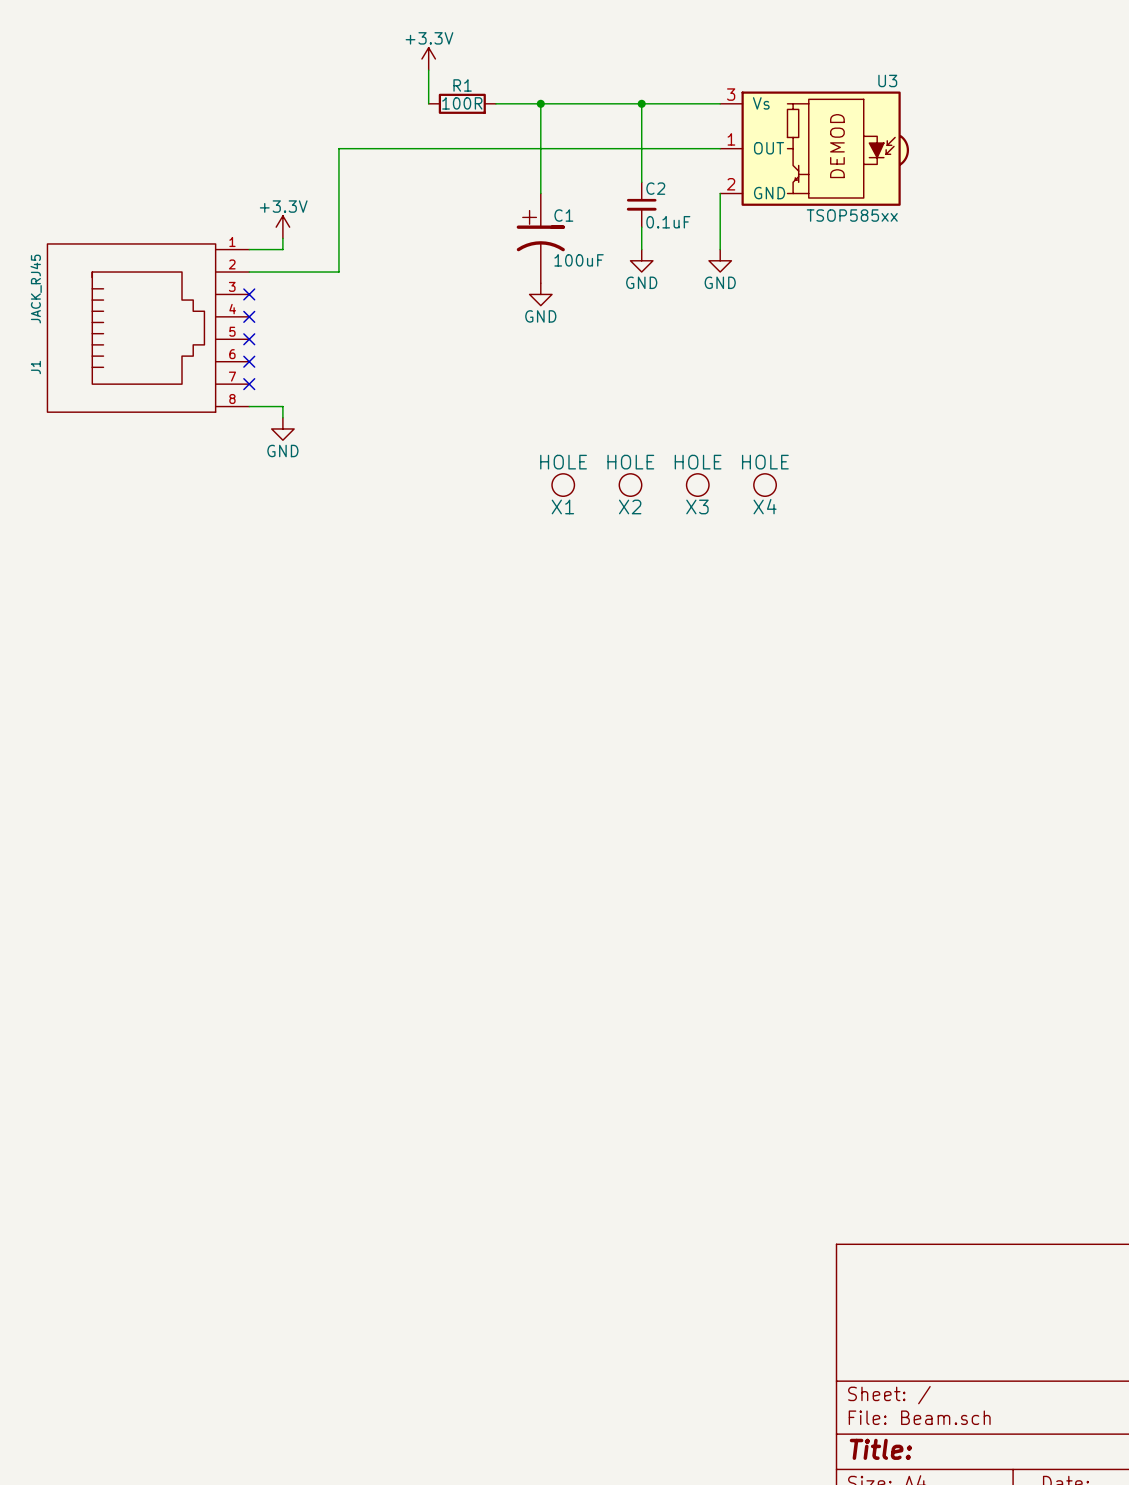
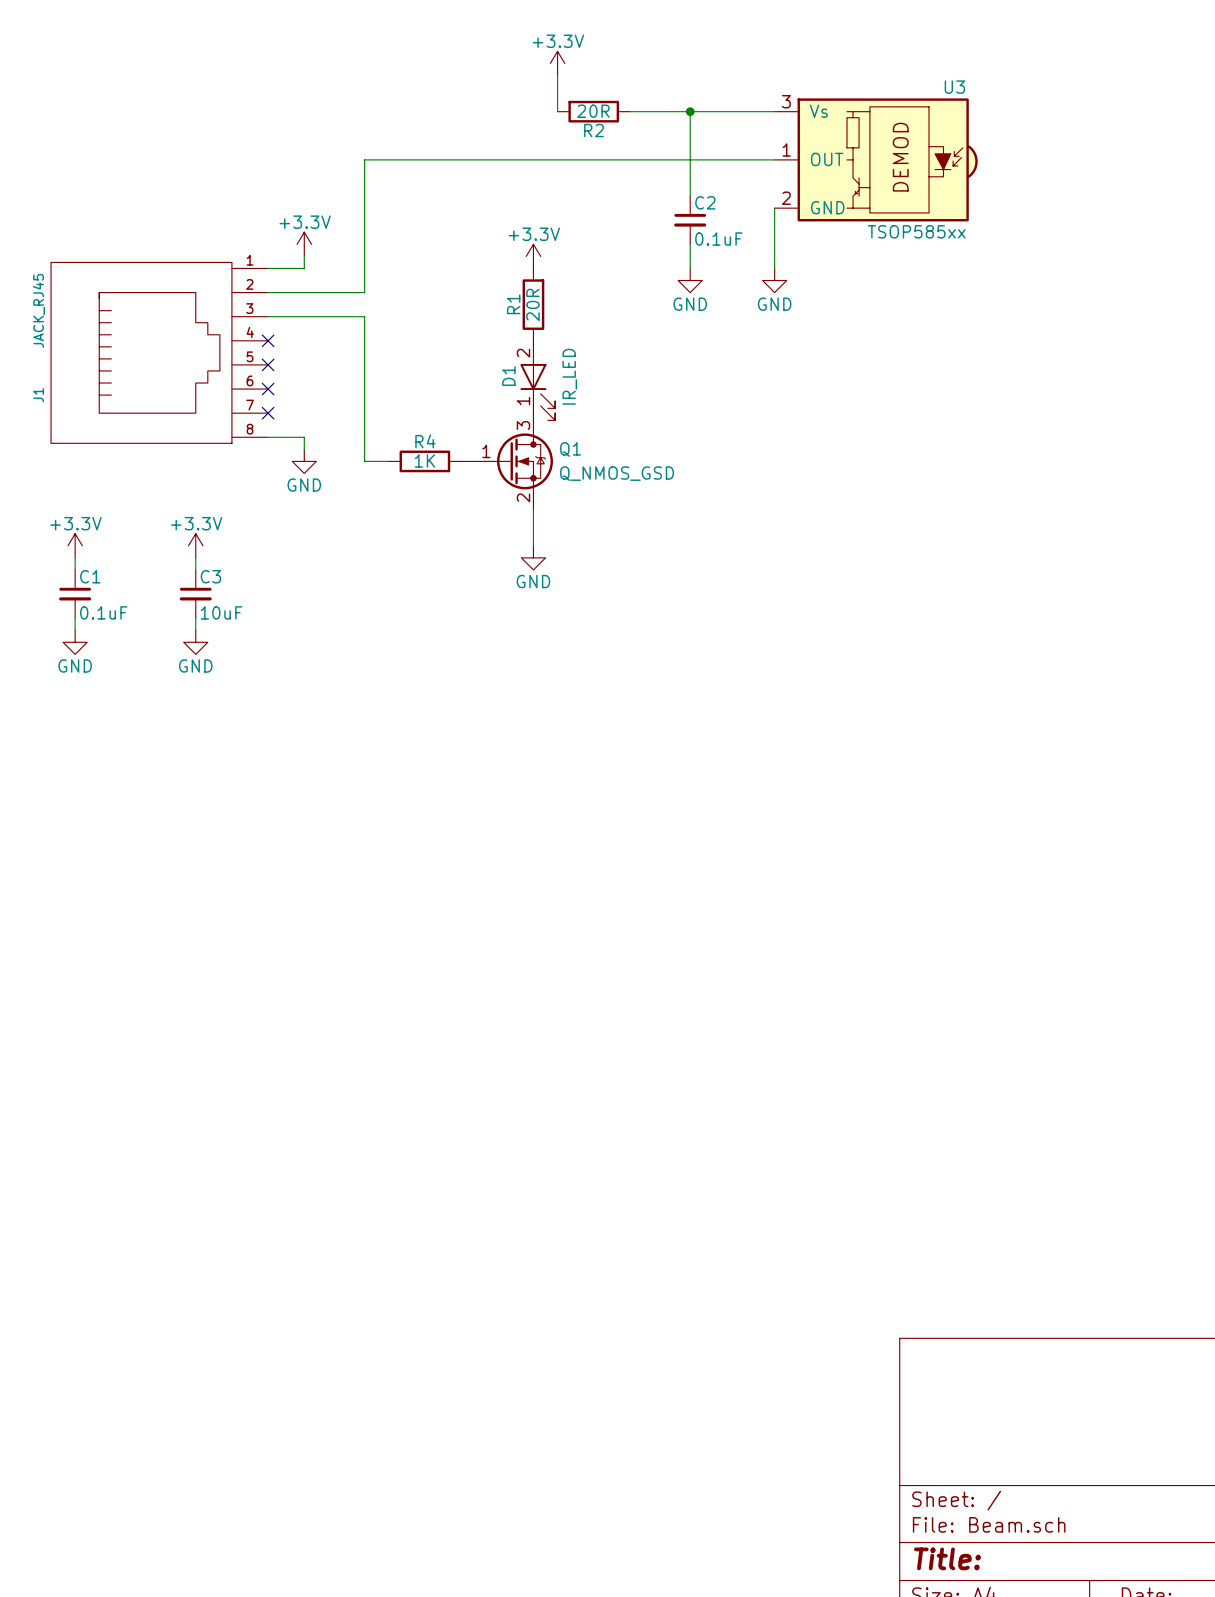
power symbol position: +3.3V (428, 58) -> +3.3V (557, 63)
wire: (428, 70) (428, 103) -> (557, 75) (557, 111)
R1 name position: R1 (462, 85) -> R1 (513, 304)
R1 rotation: 0° (462, 103) -> 90° clockwise (533, 304)
R1 position: (462, 103) -> (533, 304)
R1 value: 100R (462, 103) -> 20R (532, 304)
wire: (495, 103) (585, 103) -> none
wire: (540, 103) (540, 193) -> none
junction: (540, 103) -> none
R2: none -> 20R (593, 111)
C1 symbol: [516, 193, 565, 284] -> [59, 569, 92, 619]
power symbol: none -> +3.3V (533, 256)
C1 value: 100uF (579, 260) -> 0.1uF (103, 612)
wire: none -> (268, 316) (364, 316) (364, 461) (388, 461)
no-connect mark: (249, 294) -> none
power symbol: GND (540, 294) -> none
D1: none -> IR_LED (537, 380)
R4: none -> 1K (424, 461)
Q1: none -> Q_NMOS_GSD (507, 461)
wire: none -> (533, 509) (533, 545)
X1: HOLE (563, 485) -> none
X2: HOLE (630, 485) -> none
X3: HOLE (697, 485) -> none
X4: HOLE (765, 485) -> none
power symbol: none -> +3.3V (75, 545)
power symbol: none -> +3.3V (195, 545)
wire: none -> (75, 557) (75, 569)
wire: none -> (195, 557) (195, 569)
power symbol: none -> GND (533, 557)
C3: none -> 10uF (195, 594)
wire: none -> (75, 618) (75, 630)
wire: none -> (195, 618) (195, 630)
power symbol: none -> GND (75, 642)
power symbol: none -> GND (195, 642)

